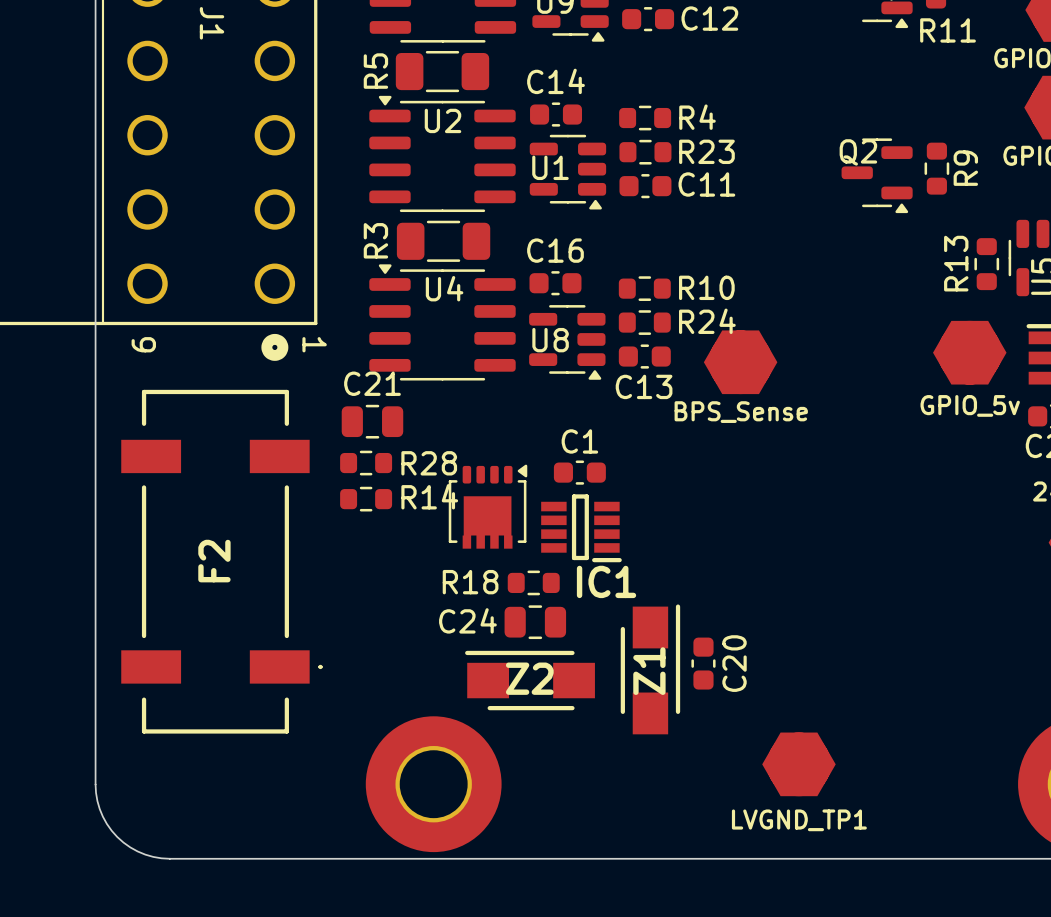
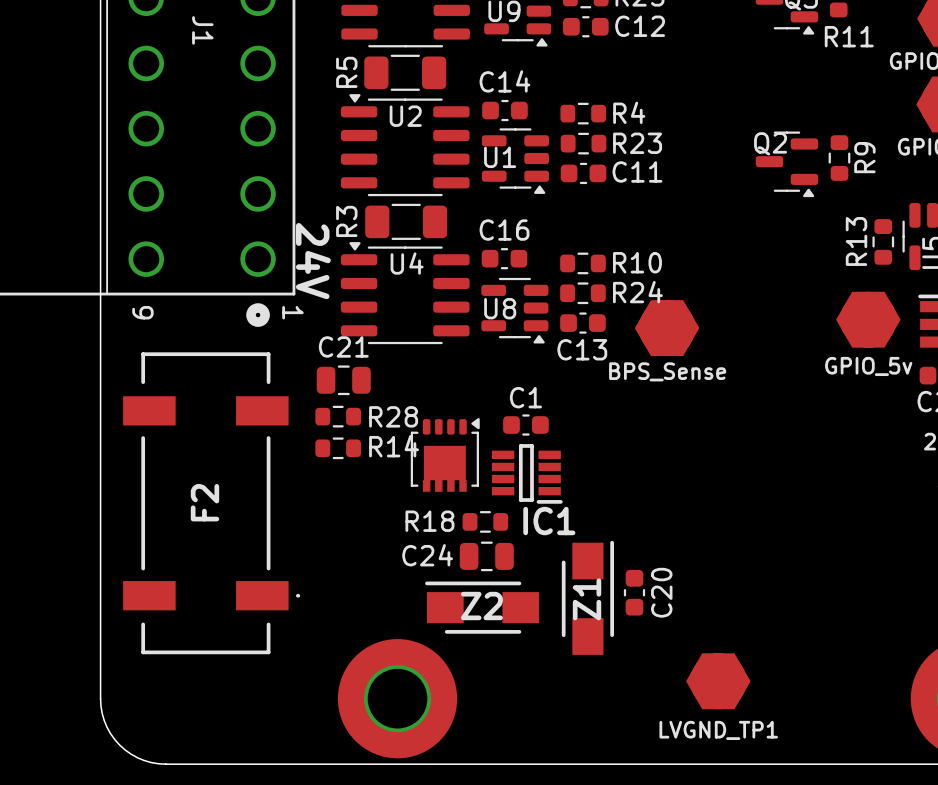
text: none -> 24V (313, 261)

